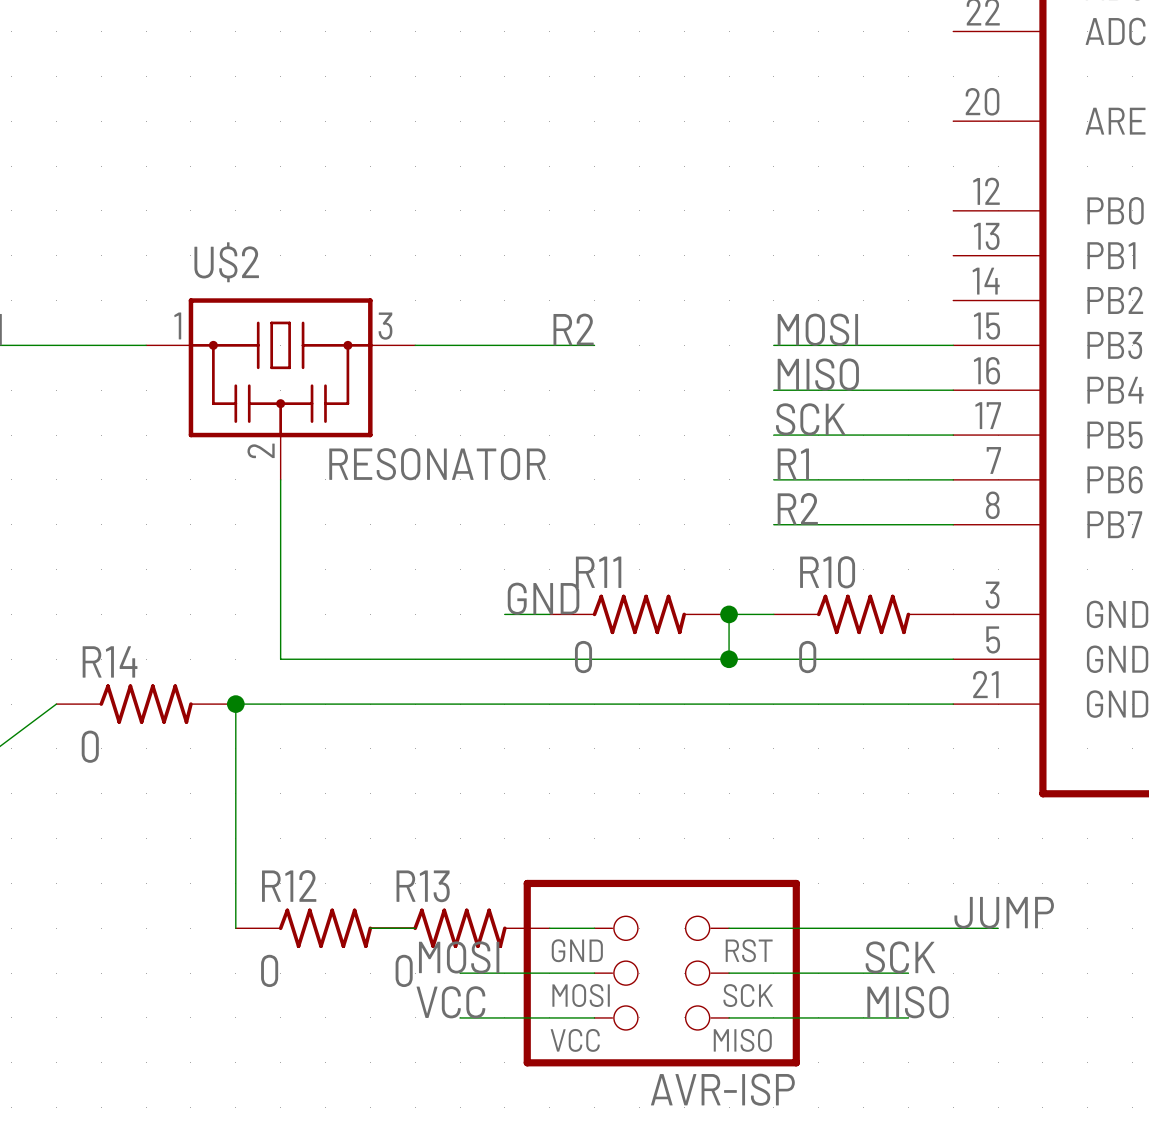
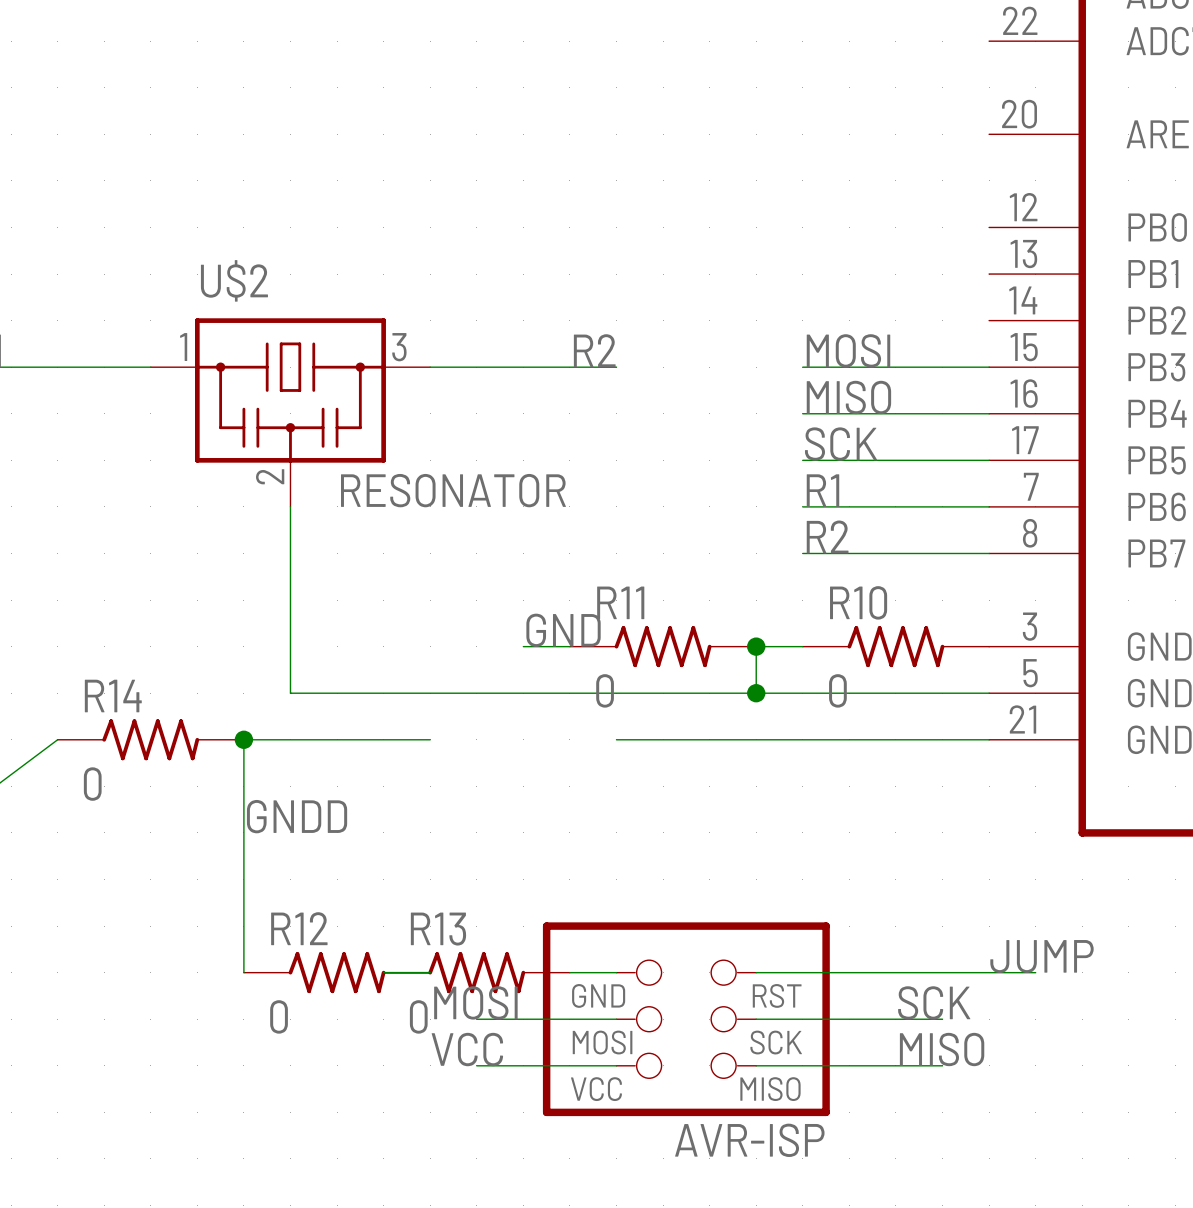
wire: (415, 704) (594, 704) -> none
label: none -> GNDD (297, 816)

